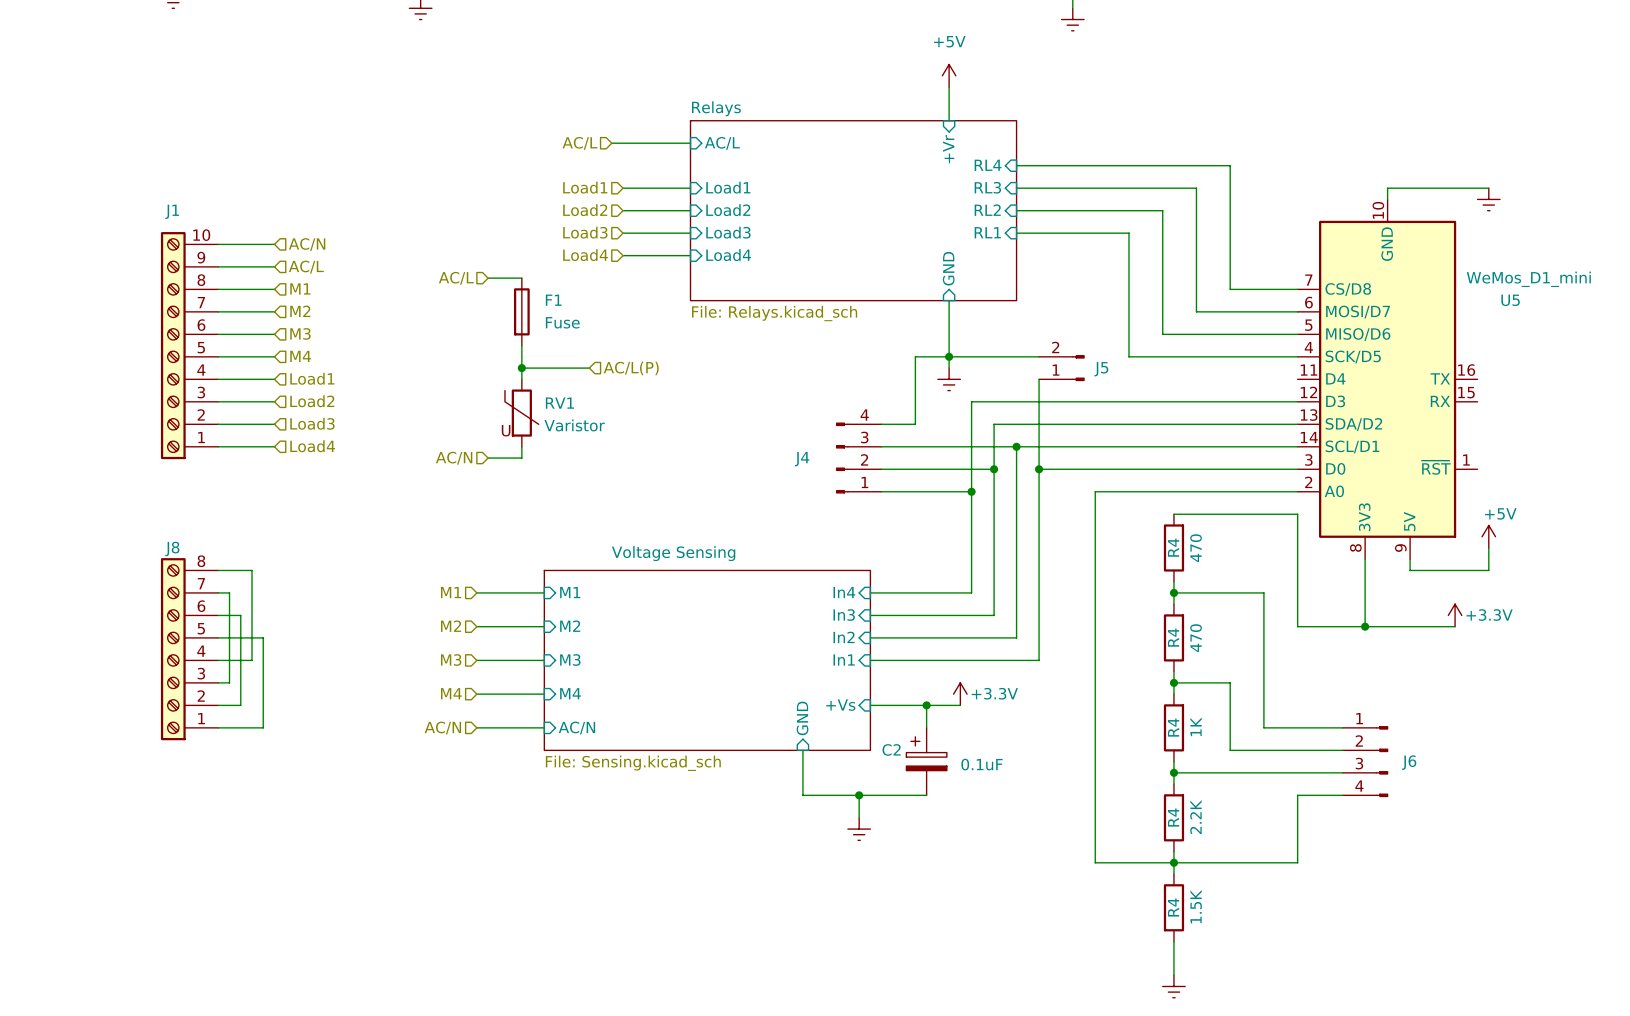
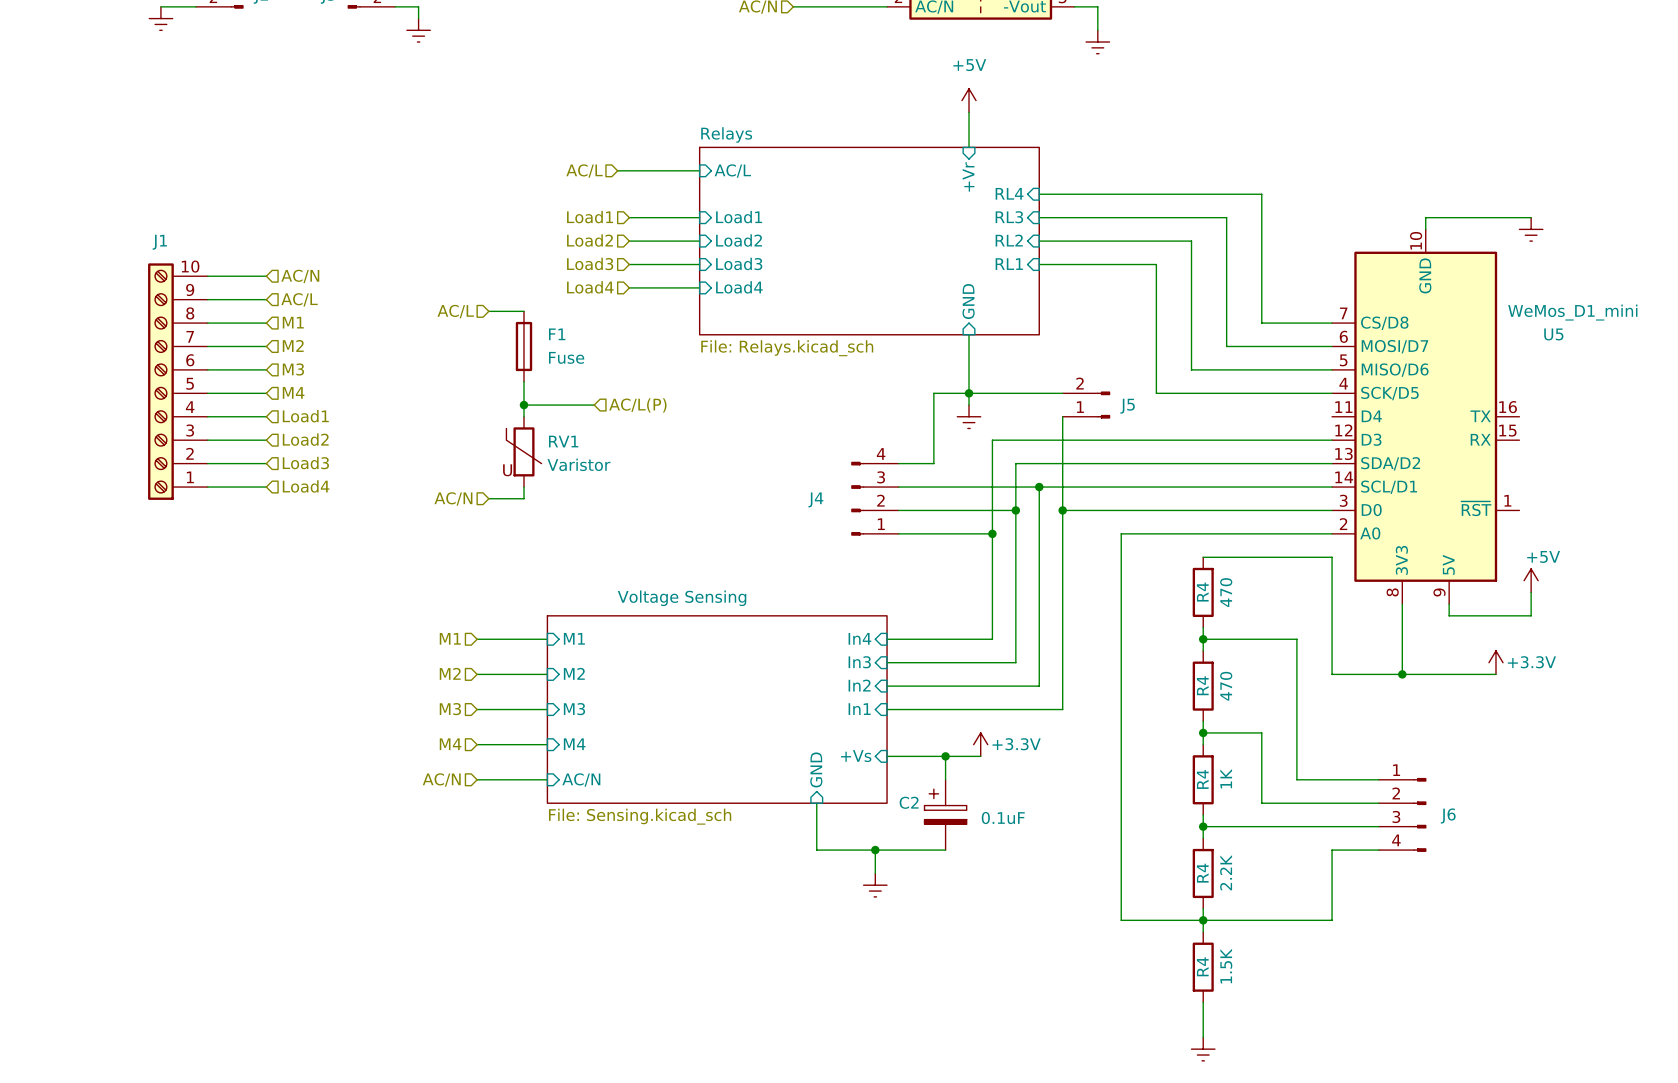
wire: (218, 570) (252, 570) (252, 660) (218, 660) -> none
wire: (218, 592) (229, 592) (229, 682) (218, 682) -> none
wire: (218, 615) (240, 615) (240, 705) (218, 705) -> none
wire: (218, 637) (263, 637) (263, 727) (218, 727) -> none
J8: (189, 649) -> none

